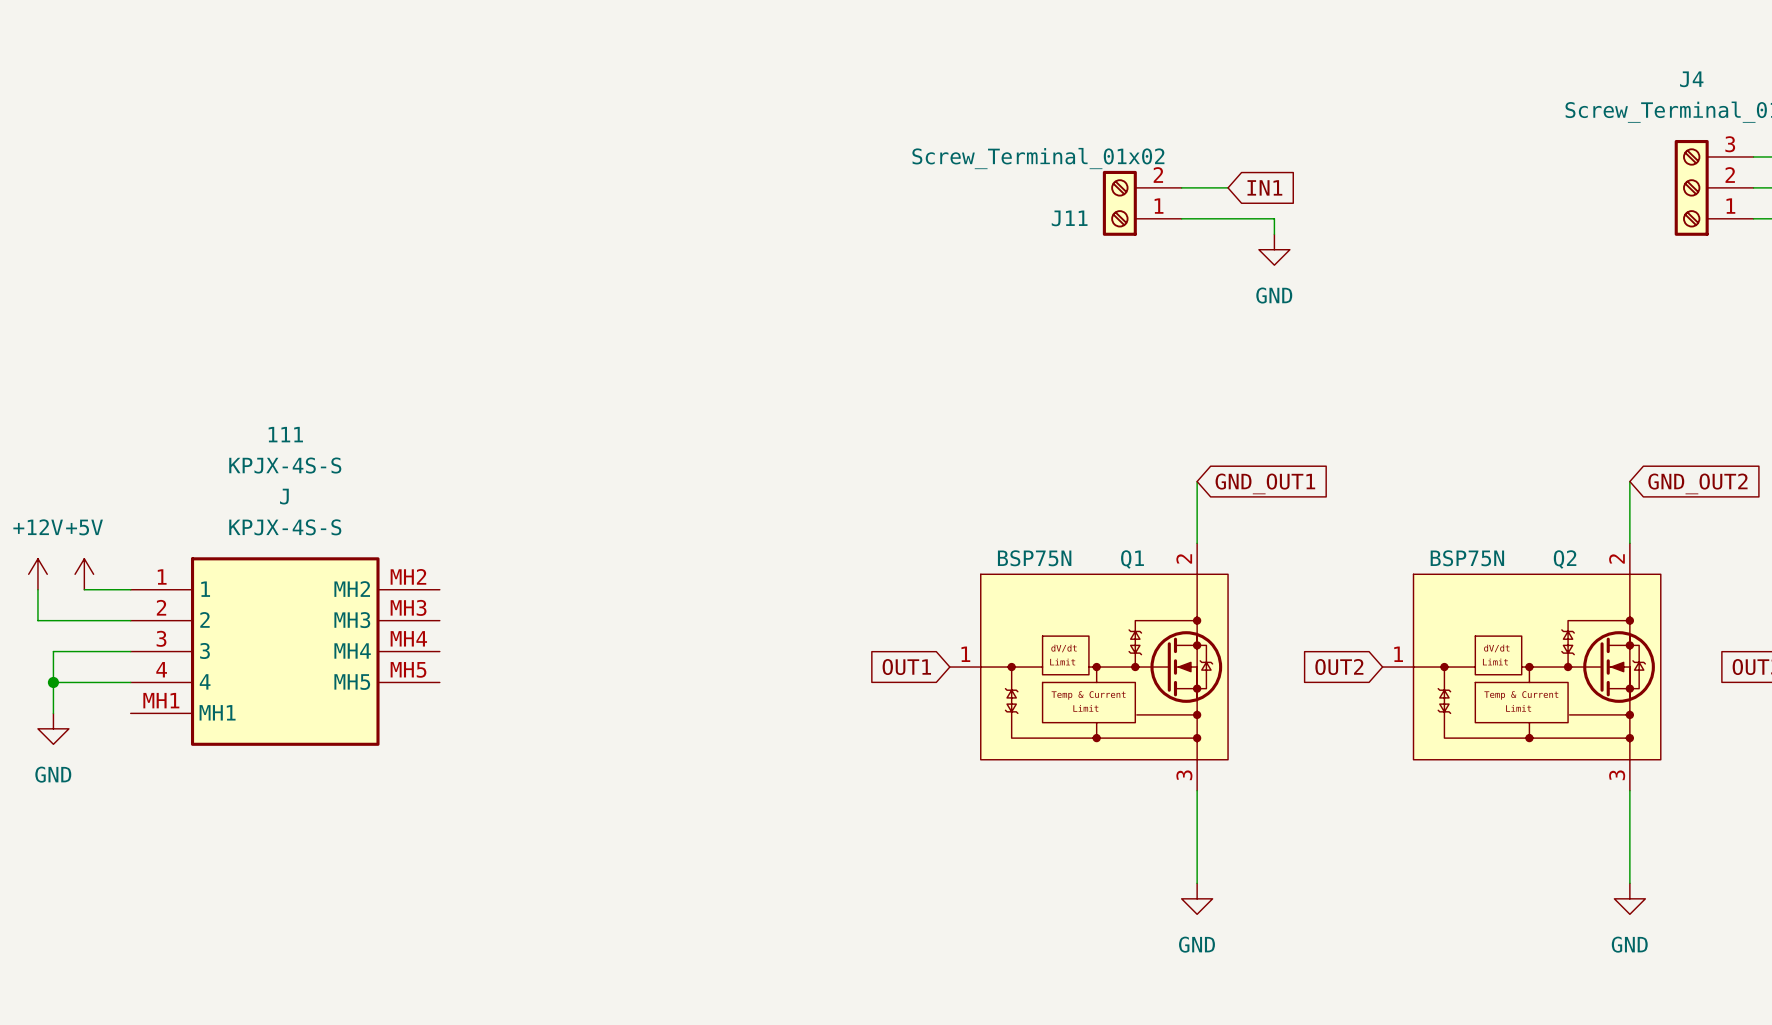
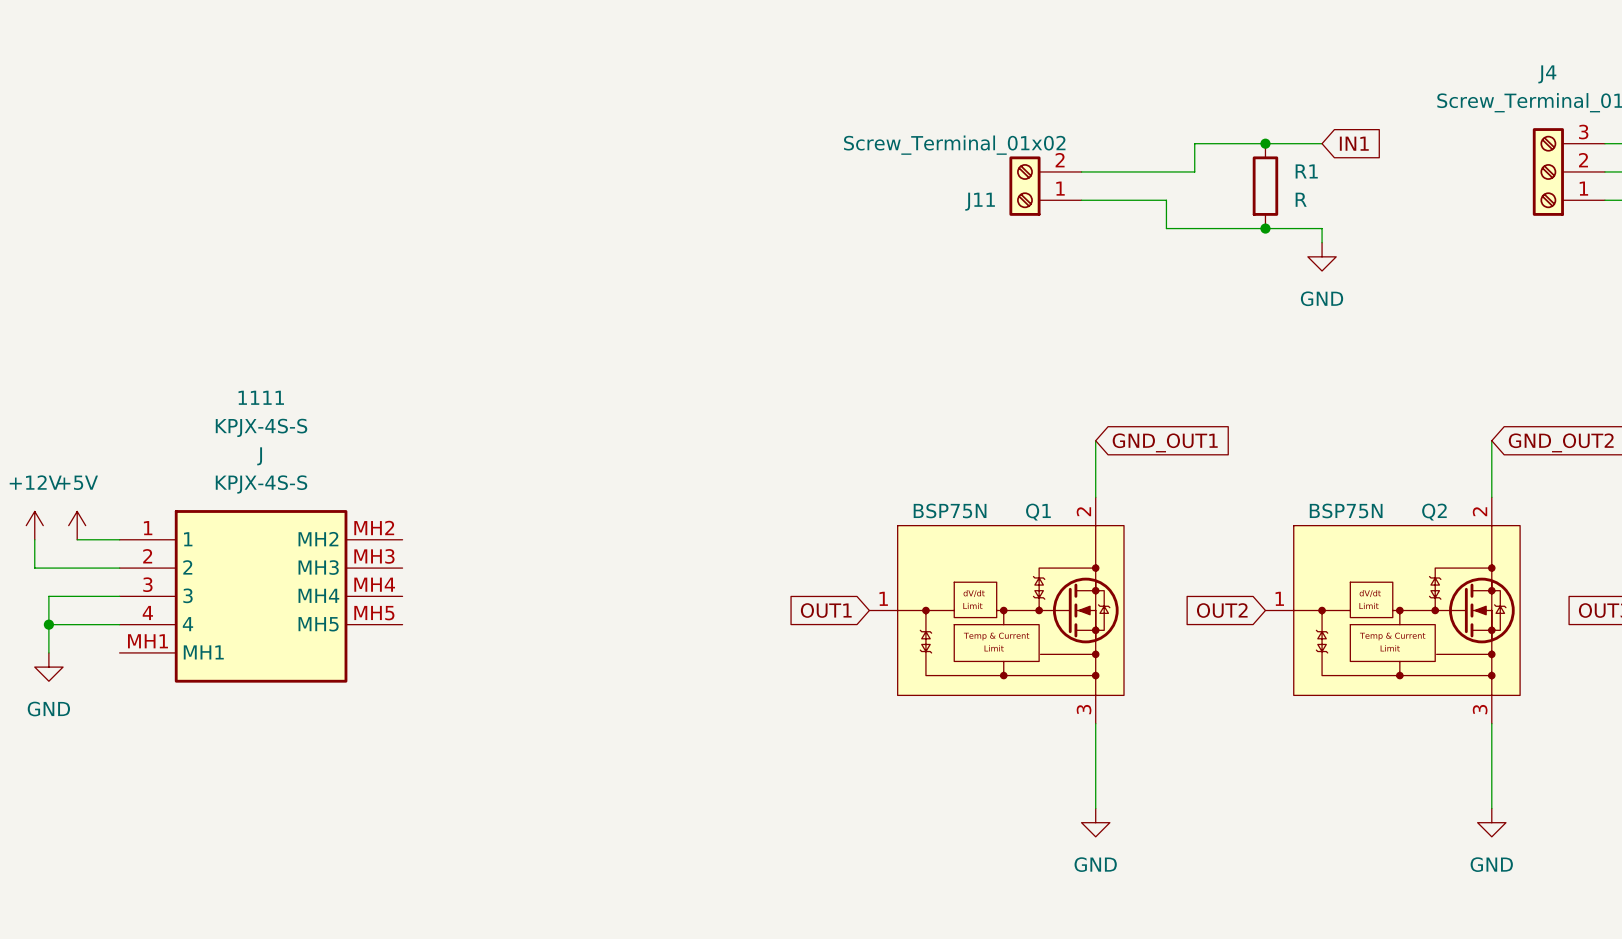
junction: none -> (1265, 143)
wire: none -> (1322, 143) (1194, 143) (1194, 171) (1124, 171)
global label position: IN1 (1264, 187) -> IN1 (1354, 143)
R1: none -> R (1265, 186)
wire: none -> (1166, 214) (1166, 228) (1322, 228) (1322, 242)
power symbol position: GND (1274, 249) -> GND (1322, 256)
junction: none -> (1265, 228)
111 name: 111 (285, 434) -> 1111 (261, 397)

